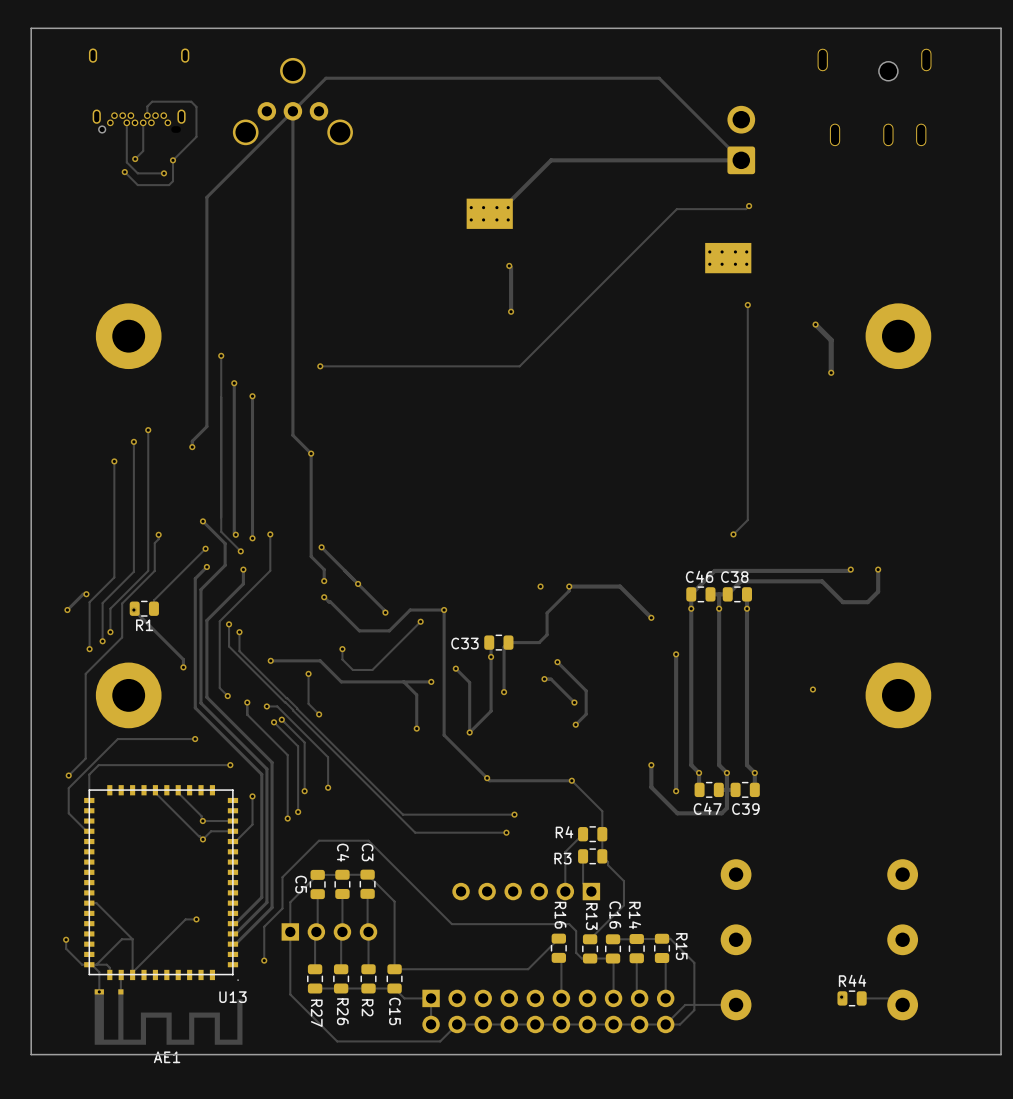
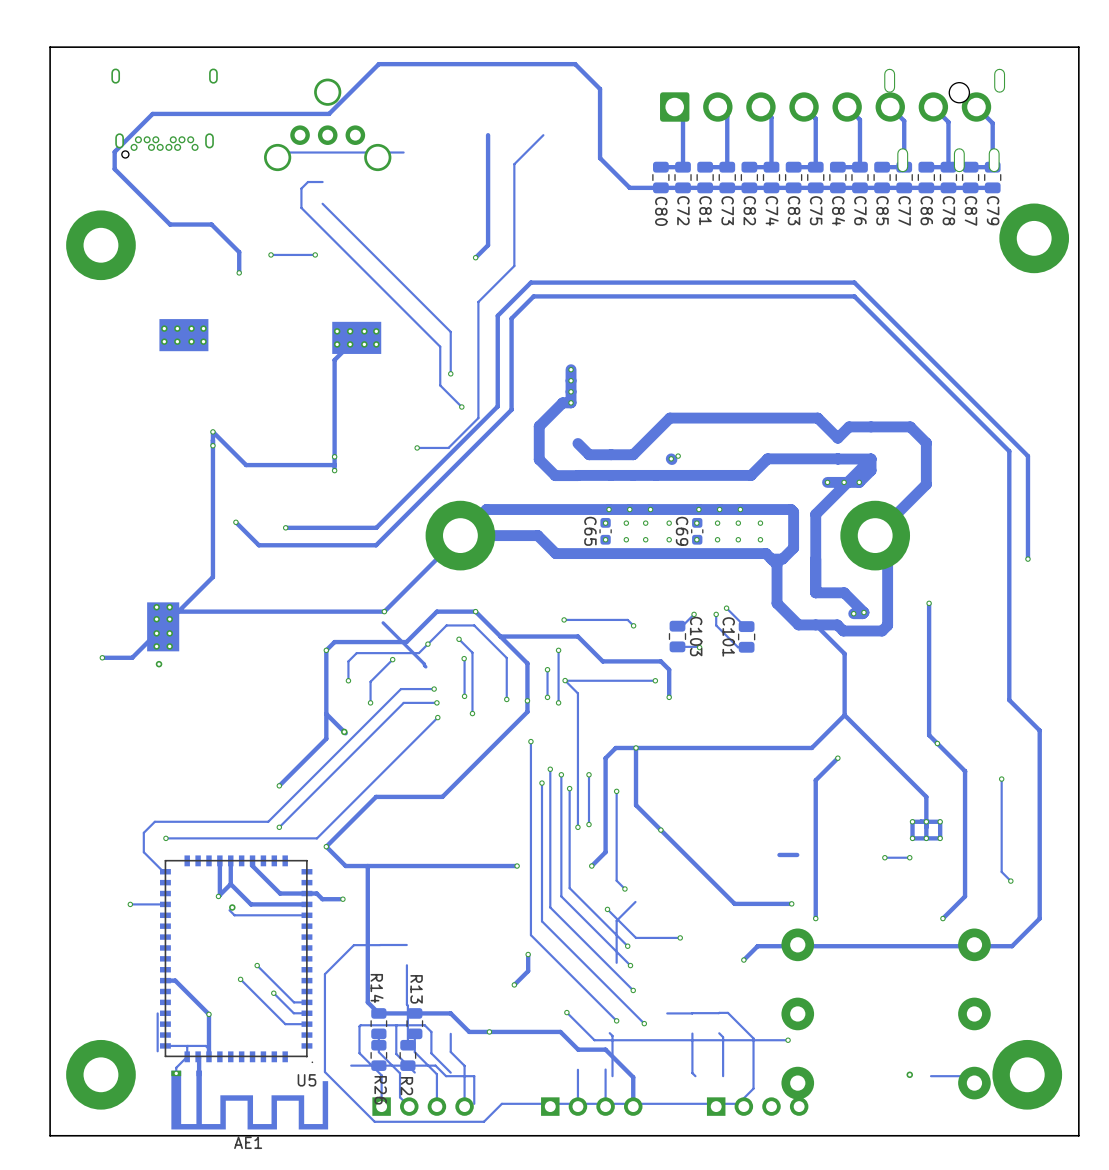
track: none -> (674, 107) (683, 115) (683, 167) (660, 167)
track: none -> (717, 107) (727, 116) (727, 167) (705, 167)
track: none -> (760, 107) (771, 117) (771, 167) (749, 167)
track: none -> (804, 107) (815, 118) (815, 167) (793, 167)
part: none -> (825, 107)
track: none -> (847, 107) (859, 119) (859, 167) (837, 167)
track: none -> (890, 107) (904, 120) (904, 167) (882, 167)
track: none -> (933, 107) (948, 122) (948, 167) (926, 167)
track: none -> (976, 107) (992, 123) (992, 167) (970, 167)
track: (292, 111) (292, 435) (311, 453) (311, 556) (324, 569) (324, 581) -> none
track: none -> (488, 135) (488, 245) (475, 257)
track: none -> (543, 135) (514, 164) (514, 266) (478, 301) (478, 418) (448, 447) (417, 447)
track: (147, 115) (147, 106) (152, 101) (191, 101) (196, 106) (196, 136) (173, 160) (173, 181) (169, 185) (137, 185) (124, 172) -> none
track: (126, 122) (126, 162) (137, 173) (164, 173) -> none
track: (143, 122) (143, 151) (135, 159) -> none
track: none -> (403, 152) (270, 152)
part: (741, 140) -> none
C80: none -> (660, 177)
C72: none -> (683, 177)
C81: none -> (705, 177)
C73: none -> (727, 177)
C82: none -> (749, 177)
C74: none -> (771, 177)
C83: none -> (793, 177)
C75: none -> (815, 177)
C84: none -> (837, 177)
C76: none -> (859, 177)
C85: none -> (882, 177)
C77: none -> (904, 177)
C86: none -> (926, 177)
C78: none -> (948, 177)
C87: none -> (970, 177)
C79: none -> (992, 177)
track: none -> (322, 182) (308, 182) (301, 188) (301, 207) (440, 346) (440, 385) (461, 407)
via: (135, 159) -> none
via: (173, 160) -> none
track: none -> (992, 187) (629, 187) (600, 158) (600, 89) (575, 64) (378, 64) (329, 113) (152, 113) (114, 151) (114, 169) (170, 224) (211, 224) (239, 252) (239, 272)
via: (124, 172) -> none
via: (164, 173) -> none
track: none -> (322, 203) (450, 331) (450, 373)
track: (749, 206) (746, 209) (676, 209) (519, 366) (320, 366) -> none
via: (749, 206) -> none
part: none -> (1034, 238)
track: (489, 213) (497, 213) (551, 160) (741, 160) (659, 78) (326, 78) (206, 197) (206, 426) (192, 441) (192, 447) -> none
part: (489, 213) -> none
via: none -> (271, 254)
track: none -> (315, 254) (271, 254)
via: none -> (315, 254)
via: none -> (475, 257)
via: none -> (239, 272)
part: (728, 258) -> none
track: (509, 265) (511, 267) (511, 311) -> none
via: (509, 265) -> none
part: none -> (183, 335)
track: none -> (356, 337) (334, 360) (334, 470)
part: none -> (356, 337)
track: (747, 305) (747, 520) (733, 534) -> none
via: (747, 305) -> none
via: (511, 311) -> none
track: (815, 324) (831, 340) (831, 372) -> none
via: (815, 324) -> none
track: none -> (571, 369) (571, 402) (562, 402) (539, 426) (539, 459) (555, 475) (751, 475) (767, 458) (871, 459)
via: none -> (571, 369)
part position: (128, 336) -> (100, 245)
via: none -> (450, 373)
part: (898, 336) -> none
via: none -> (571, 380)
via: none -> (571, 391)
track: (221, 355) (221, 531) (240, 551) -> none
via: (221, 355) -> none
via: none -> (571, 402)
via: (320, 366) -> none
via: none -> (461, 407)
via: (831, 372) -> none
track: (234, 383) (234, 533) (235, 534) -> none
via: (234, 383) -> none
via: none -> (212, 431)
track: (252, 396) (252, 538) -> none
via: (252, 396) -> none
track: none -> (577, 443) (589, 454) (633, 454) (669, 418) (817, 418) (837, 438) (849, 426) (910, 426) (926, 442) (926, 484) (875, 535) (887, 548) (887, 625) (882, 630) (843, 630) (837, 624) (798, 624) (777, 603) (777, 564) (765, 553) (555, 553) (537, 535) (460, 535)
via: none -> (212, 445)
via: none -> (417, 447)
via: none -> (678, 456)
via: none -> (334, 456)
track: none -> (671, 458) (671, 459)
via: none -> (671, 458)
track: none -> (871, 459) (871, 470) (859, 482) (827, 482)
track: none -> (871, 459) (815, 514) (815, 592)
track: none -> (334, 465) (246, 465) (212, 431) (212, 577) (132, 657) (102, 657)
via: none -> (334, 470)
track: (148, 430) (148, 570) (110, 608) (110, 632) -> none
via: (148, 430) -> none
via: none -> (827, 482)
via: none -> (844, 482)
via: none -> (859, 482)
track: (133, 441) (133, 571) (102, 603) (102, 641) -> none
via: (133, 441) -> none
via: (192, 447) -> none
via: (311, 453) -> none
track: (114, 461) (114, 577) (89, 602) (89, 649) -> none
via: (114, 461) -> none
via: none -> (609, 509)
via: none -> (629, 509)
via: none -> (650, 509)
via: none -> (698, 509)
via: none -> (719, 509)
via: none -> (740, 509)
track: none -> (235, 522) (258, 545) (376, 545) (511, 409) (511, 318) (533, 296) (854, 296) (1009, 451) (1009, 700) (1039, 730) (1039, 918) (1012, 946) (757, 946) (743, 960)
via: none -> (235, 522)
via: none -> (605, 523)
via: none -> (626, 523)
via: none -> (645, 523)
via: none -> (669, 523)
via: none -> (696, 523)
via: none -> (717, 523)
via: none -> (738, 523)
via: none -> (760, 523)
track: none -> (285, 527) (376, 527) (497, 406) (497, 315) (530, 282) (854, 282) (1027, 456) (1027, 559)
via: none -> (285, 527)
C65: none -> (605, 531)
C69: none -> (697, 531)
track: none -> (460, 535) (486, 509) (791, 509) (793, 512) (793, 548) (782, 559) (771, 559)
track: none -> (460, 535) (384, 611) (178, 611)
part: none -> (460, 535)
part: none -> (875, 535)
via: none -> (605, 539)
via: none -> (626, 539)
via: none -> (645, 539)
via: none -> (669, 539)
via: none -> (696, 539)
via: none -> (717, 539)
via: none -> (738, 539)
via: none -> (760, 539)
via: none -> (1027, 559)
track: (202, 521) (225, 543) (225, 565) (200, 589) (200, 703) (266, 769) (266, 902) (235, 933) (232, 933) -> none
via: (202, 521) -> none
track: (158, 534) (158, 539) (154, 543) (154, 570) (122, 603) (122, 637) (85, 673) (85, 758) (68, 775) -> none
via: (158, 534) -> none
via: (235, 534) -> none
track: (270, 534) (270, 570) (219, 621) (219, 688) (227, 696) -> none
via: (270, 534) -> none
via: (733, 534) -> none
via: (252, 538) -> none
track: none -> (815, 592) (844, 592) (863, 612) (853, 613)
track: (321, 547) (354, 580) -> none
via: (321, 547) -> none
track: (205, 548) (153, 600) (153, 608) -> none
via: (205, 548) -> none
via: (240, 551) -> none
track: none -> (929, 603) (929, 735) (965, 771) (965, 896)
via: none -> (929, 603)
track: none -> (726, 608) (746, 626)
via: none -> (726, 608)
via: none -> (384, 611)
via: none -> (475, 611)
via: none -> (863, 612)
via: none -> (853, 613)
track: none -> (694, 614) (682, 626) (677, 626)
via: none -> (694, 614)
track: none -> (716, 614) (716, 625) (738, 647) (746, 647)
via: none -> (716, 614)
track: (206, 567) (195, 578) (195, 707) (261, 774) (261, 897) (235, 923) (232, 923) -> none
via: (206, 567) -> none
track: none -> (564, 619) (627, 619) (633, 625)
via: none -> (564, 619)
track: (243, 569) (243, 583) (206, 620) (206, 697) (272, 762) (272, 907) (235, 944) (232, 944) -> none
via: (243, 569) -> none
via: (850, 569) -> none
via: (878, 569) -> none
track: (849, 570) (714, 570) (691, 594) (691, 765) (699, 772) (699, 789) -> none
track: (878, 570) (878, 591) (867, 602) (842, 602) (822, 581) (740, 581) (727, 594) (710, 594) -> none
via: none -> (633, 625)
track: none -> (815, 624) (844, 653) (844, 715)
part: none -> (163, 626)
via: (324, 581) -> none
via: (358, 583) -> none
track: none -> (500, 636) (577, 636) (602, 661) (660, 661) (669, 669) (669, 697)
C103: none -> (677, 636)
C101: none -> (746, 636)
track: none -> (459, 639) (472, 652) (472, 713)
via: none -> (459, 639)
via: (540, 586) -> none
via: (569, 586) -> none
via: none -> (427, 644)
track: none -> (677, 646) (699, 647)
track: (86, 594) (83, 594) (67, 610) -> none
via: (86, 594) -> none
via: none -> (699, 647)
C46: (700, 594) -> none
track: (719, 594) (719, 765) (726, 772) (726, 808) (721, 813) (677, 813) (651, 787) (651, 765) -> none
C38: (737, 594) -> none
track: (747, 594) (747, 765) (754, 772) (754, 789) -> none
via: none -> (326, 650)
track: none -> (558, 650) (558, 702)
via: none -> (558, 650)
track: (324, 597) (359, 630) (389, 630) (410, 610) (444, 610) (444, 735) (489, 780) (571, 780) (602, 811) (602, 856) (608, 862) (608, 865) (623, 881) (623, 905) (590, 939) -> none
via: (324, 597) -> none
via: none -> (102, 657)
track: none -> (464, 658) (464, 696)
via: none -> (464, 658)
track: none -> (392, 659) (370, 681) (370, 702)
via: none -> (392, 659)
R1: (144, 608) -> none
via: (691, 608) -> none
via: (719, 608) -> none
via: (747, 608) -> none
via: (67, 610) -> none
track: (133, 610) (183, 659) (183, 667) -> none
via: (444, 610) -> none
via: (385, 612) -> none
track: none -> (547, 669) (547, 697)
via: none -> (547, 669)
track: (651, 617) (620, 586) (569, 586) (569, 590) (547, 613) (547, 634) (539, 642) (508, 642) (504, 647) (504, 692) -> none
via: (651, 617) -> none
track: (420, 621) (372, 669) (352, 669) (342, 659) (342, 649) -> none
via: (420, 621) -> none
track: (229, 624) (229, 646) (415, 832) (506, 832) -> none
via: (229, 624) -> none
track: none -> (348, 680) (348, 661) (356, 653) (418, 653) (446, 625) (474, 625) (506, 657) (506, 699)
via: none -> (348, 680)
track: none -> (565, 680) (577, 693) (577, 827)
via: none -> (565, 680)
track: none -> (655, 680) (565, 680)
via: none -> (655, 680)
via: (110, 632) -> none
track: (239, 632) (239, 651) (402, 814) (514, 814) -> none
via: (239, 632) -> none
track: none -> (434, 689) (400, 689) (268, 821) (154, 821) (143, 832) (143, 852) (165, 871)
via: none -> (434, 689)
via: none -> (464, 696)
via: (102, 641) -> none
via: none -> (547, 697)
via: none -> (669, 697)
track: (489, 642) (491, 644) (491, 711) (469, 732) (469, 682) (455, 668) -> none
C33: (498, 642) -> none
via: none -> (506, 699)
via: none -> (527, 700)
via: none -> (370, 702)
track: none -> (436, 702) (403, 702) (279, 827)
via: none -> (436, 702)
via: none -> (558, 702)
via: (89, 649) -> none
via: (342, 649) -> none
track: (676, 654) (676, 791) -> none
via: (676, 654) -> none
track: none -> (326, 713) (345, 733)
via: none -> (472, 713)
via: (491, 656) -> none
track: none -> (844, 715) (811, 747) (615, 747) (605, 758) (605, 852) (591, 866)
track: none -> (844, 715) (926, 796) (926, 838)
track: (270, 660) (320, 660) (341, 681) (431, 681) -> none
via: (270, 660) -> none
track: none -> (437, 717) (316, 838) (165, 838)
via: none -> (437, 717)
track: (557, 662) (586, 690) (586, 714) (575, 724) -> none
via: (557, 662) -> none
via: (183, 667) -> none
via: (455, 668) -> none
track: (308, 673) (308, 703) (319, 714) -> none
track: (544, 679) (550, 679) (574, 702) -> none
via: (544, 679) -> none
track: (403, 681) (416, 694) (416, 728) -> none
via: (431, 681) -> none
track: none -> (530, 741) (530, 935) (616, 1020)
via: none -> (530, 741)
via: none -> (937, 743)
track: none -> (636, 747) (636, 805) (734, 903) (791, 903)
via: none -> (636, 747)
via: (812, 689) -> none
via: (504, 692) -> none
part: (128, 695) -> none
part: (898, 695) -> none
via: (227, 696) -> none
track: none -> (837, 758) (815, 780) (815, 918)
via: none -> (837, 758)
track: (247, 702) (247, 714) (287, 755) (287, 818) -> none
via: (247, 702) -> none
via: (574, 702) -> none
track: (266, 706) (277, 706) (328, 757) (328, 787) -> none
via: (266, 706) -> none
track: none -> (550, 769) (550, 907) (633, 990)
via: none -> (550, 769)
via: (319, 714) -> none
track: none -> (561, 774) (561, 896) (630, 965)
via: none -> (561, 774)
track: none -> (589, 774) (589, 824)
via: none -> (589, 774)
track: none -> (1001, 779) (1001, 871) (1010, 881)
via: none -> (1001, 779)
track: (281, 719) (304, 742) (304, 791) -> none
via: (281, 719) -> none
track: (274, 722) (298, 746) (298, 812) -> none
via: (274, 722) -> none
track: none -> (541, 783) (541, 921) (644, 1023)
via: none -> (541, 783)
track: none -> (279, 785) (326, 738) (326, 650) (334, 642) (406, 642) (436, 611) (475, 611) (527, 663) (527, 711) (442, 796) (376, 796) (326, 846) (345, 866) (517, 866)
via: none -> (279, 785)
via: (575, 724) -> none
track: none -> (569, 788) (569, 888) (627, 946)
via: none -> (569, 788)
via: (416, 728) -> none
track: none -> (616, 791) (616, 880) (624, 889)
via: none -> (616, 791)
via: (469, 732) -> none
track: (195, 739) (117, 739) (68, 788) (68, 813) (86, 831) (89, 831) -> none
via: (195, 739) -> none
via: none -> (912, 821)
via: none -> (926, 821)
track: none -> (940, 821) (912, 821) (912, 838) (940, 838) (940, 821)
via: none -> (940, 821)
via: none -> (589, 824)
via: none -> (279, 827)
via: none -> (577, 827)
track: (230, 765) (98, 765) (89, 774) (89, 800) -> none
via: (230, 765) -> none
via: (651, 765) -> none
via: none -> (660, 830)
via: (699, 772) -> none
via: (726, 772) -> none
via: (754, 772) -> none
via: none -> (165, 838)
via: none -> (912, 838)
via: none -> (926, 838)
via: none -> (940, 838)
via: (68, 775) -> none
via: (487, 778) -> none
via: (571, 780) -> none
via: none -> (326, 846)
via: (328, 787) -> none
C47: (709, 789) -> none
C39: (745, 789) -> none
track: (144, 790) (155, 790) (155, 792) (202, 839) (211, 831) (232, 831) -> none
track: (178, 790) (178, 792) (201, 816) (202, 821) (232, 821) -> none
via: (304, 791) -> none
via: (676, 791) -> none
via: none -> (884, 857)
track: none -> (909, 857) (884, 857)
via: none -> (909, 857)
track: none -> (219, 860) (219, 895)
track: none -> (230, 860) (230, 884)
track: none -> (252, 860) (252, 865) (280, 893) (316, 893) (322, 899) (340, 899)
track: (252, 796) (252, 824) (235, 841) (232, 841) -> none
via: (252, 796) -> none
track: none -> (367, 866) (367, 1002) (378, 1013) (450, 1013) (469, 1031) (560, 1031) (578, 1049) (605, 1049) (633, 1077) (633, 1106)
via: none -> (517, 866)
via: none -> (591, 866)
via: (298, 812) -> none
via: (514, 814) -> none
via: none -> (1010, 881)
track: none -> (230, 884) (218, 896)
track: none -> (230, 884) (251, 904) (306, 904)
via: (287, 818) -> none
via: (202, 821) -> none
via: none -> (624, 889)
via: none -> (218, 896)
track: none -> (965, 896) (942, 918)
via: none -> (342, 899)
via: (506, 832) -> none
R4: (592, 834) -> none
via: none -> (130, 904)
track: none -> (165, 904) (130, 904)
via: none -> (791, 903)
track: none -> (607, 909) (636, 937) (680, 937)
via: none -> (607, 909)
track: none -> (229, 910) (234, 915) (306, 915)
via: none -> (815, 918)
via: none -> (942, 918)
track: (583, 856) (583, 883) (591, 891) -> none
R3: (592, 856) -> none
via: none -> (680, 937)
track: (367, 874) (394, 901) (394, 969) (528, 969) (558, 938) -> none
via: none -> (627, 946)
U13: (161, 883) -> none
track: none -> (528, 954) (528, 971) (514, 984)
via: none -> (528, 954)
C5: (317, 884) -> none
C4: (342, 884) -> none
C3: (367, 884) -> none
U5: none -> (236, 959)
via: none -> (743, 960)
part: (526, 891) -> none
track: none -> (257, 965) (294, 1002) (306, 1002)
via: none -> (257, 965)
track: (317, 894) (315, 969) -> none
track: (342, 894) (341, 958) -> none
via: none -> (630, 965)
track: (89, 903) (96, 903) (132, 939) (121, 939) (96, 964) -> none
track: none -> (240, 979) (285, 1024) (306, 1024)
via: none -> (240, 979)
track: none -> (165, 980) (175, 980) (208, 1014) (208, 1056) (208, 1049) (205, 1045) (165, 1045)
via: none -> (514, 984)
via: none -> (633, 990)
track: (196, 919) (185, 919) (132, 972) -> none
via: (196, 919) -> none
track: none -> (273, 993) (293, 1013) (306, 1013)
via: none -> (273, 993)
part position: (329, 931) -> (423, 1106)
track: none -> (566, 1012) (594, 1040) (788, 1040)
via: none -> (566, 1012)
track: (66, 939) (66, 948) (82, 964) (106, 964) (109, 967) (109, 974) -> none
via: (66, 939) -> none
via: none -> (208, 1014)
via: none -> (616, 1020)
R16: (558, 948) -> none
R13 position: (590, 948) -> (414, 1023)
via: none -> (644, 1023)
C16: (613, 948) -> none
R14 position: (636, 948) -> (378, 1023)
R15: (662, 948) -> none
track: none -> (396, 1025) (396, 1054) (414, 1072)
via: none -> (489, 1031)
track: none -> (414, 1033) (414, 1052) (436, 1074) (436, 1106)
track: none -> (450, 1033) (450, 1052) (464, 1065) (464, 1106)
track: (264, 960) (264, 926) (282, 908) (282, 877) (318, 840) (368, 840) (451, 924) (569, 924) (576, 931) (576, 952) (581, 958) (613, 959) (613, 998) -> none
via: (264, 960) -> none
track: (91, 964) (99, 972) (99, 991) -> none
via: none -> (788, 1040)
track: none -> (187, 1045) (187, 1056) (176, 1067) (176, 1073)
track: none -> (378, 1045) (378, 1052) (400, 1073) (400, 1097) (409, 1106)
track: (121, 977) (121, 974) (120, 991) -> none
R27: (315, 978) -> none
C15: (394, 978) -> none
track: none -> (198, 1056) (199, 1073)
track: none -> (577, 1069) (577, 1106)
track: none -> (605, 1069) (605, 1106)
track: none -> (450, 1072) (431, 1053) (431, 1031) (424, 1025) (360, 1025) (359, 1053) (381, 1075) (381, 1106)
part: none -> (100, 1074)
part: none -> (1027, 1074)
R44: (852, 998) -> none
track: (736, 1004) (685, 1004) (665, 1024) -> none
part: (548, 1011) -> none
AE1 position: (168, 1017) -> (249, 1100)
part: none -> (591, 1106)
part: none -> (757, 1106)

